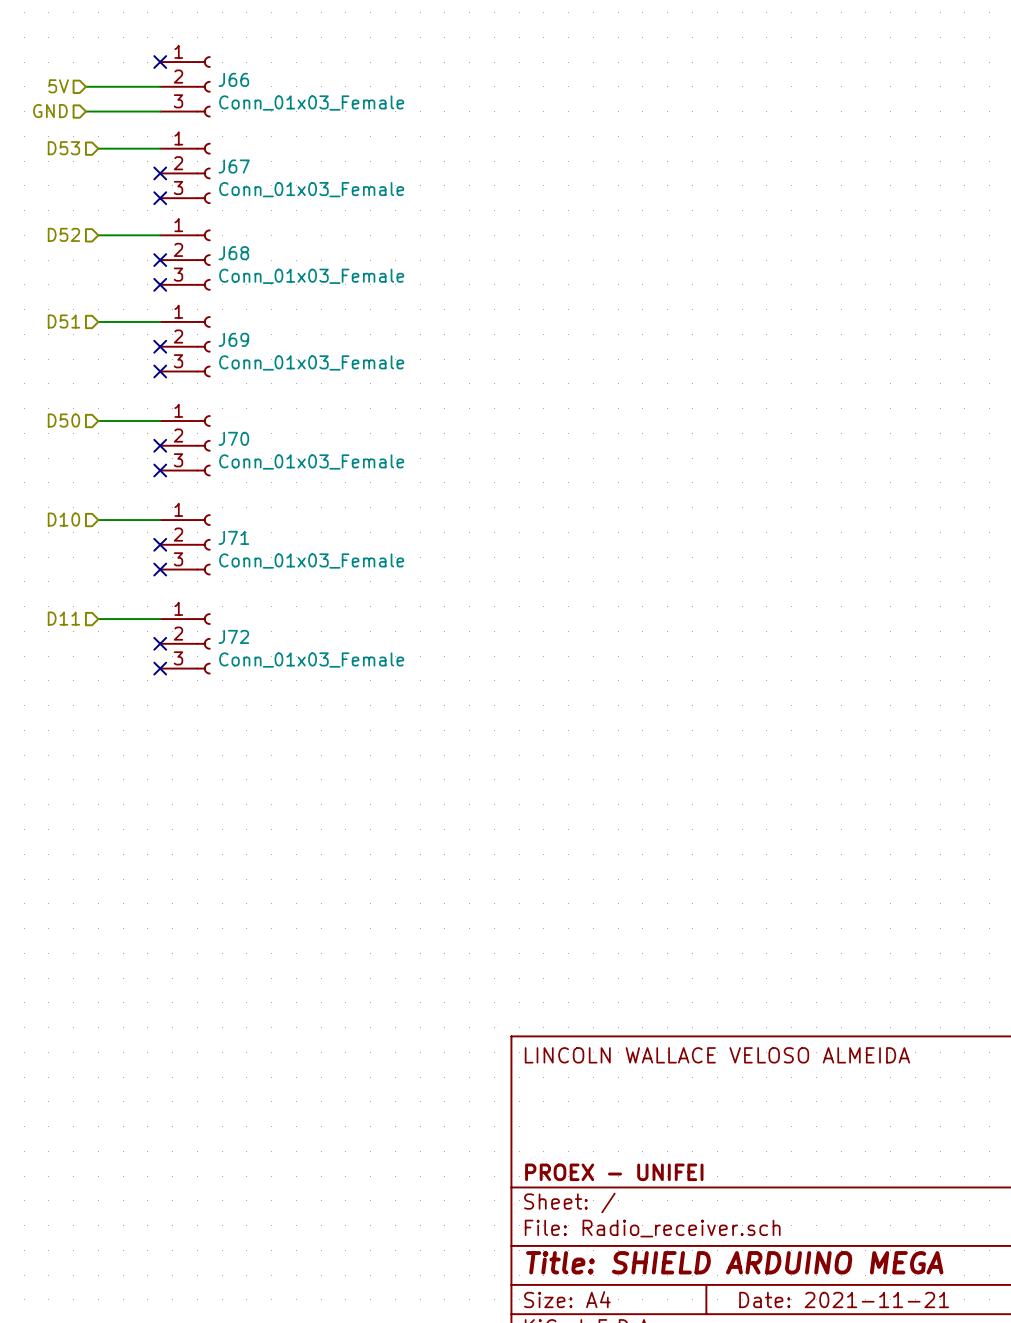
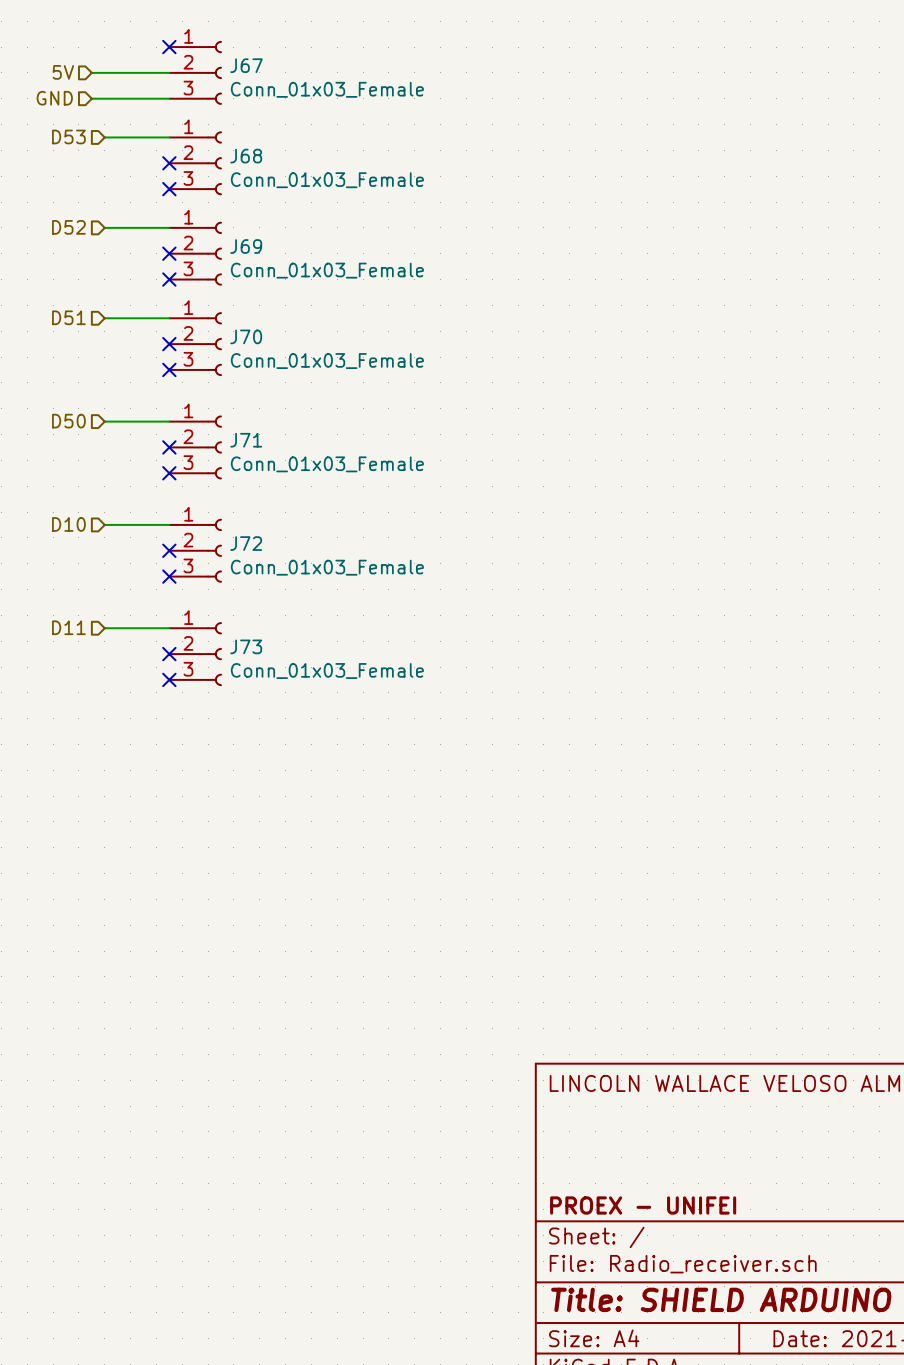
J66 name: J66 (233, 79) -> J67 (246, 65)
J67 name: J67 (234, 166) -> J68 (246, 156)
J68 name: J68 (233, 253) -> J69 (246, 246)
J69 name: J69 (233, 339) -> J70 (246, 336)
J70 name: J70 (233, 438) -> J71 (246, 440)
J71 name: J71 (233, 537) -> J72 (246, 543)
J72 name: J72 (233, 636) -> J73 (246, 646)

